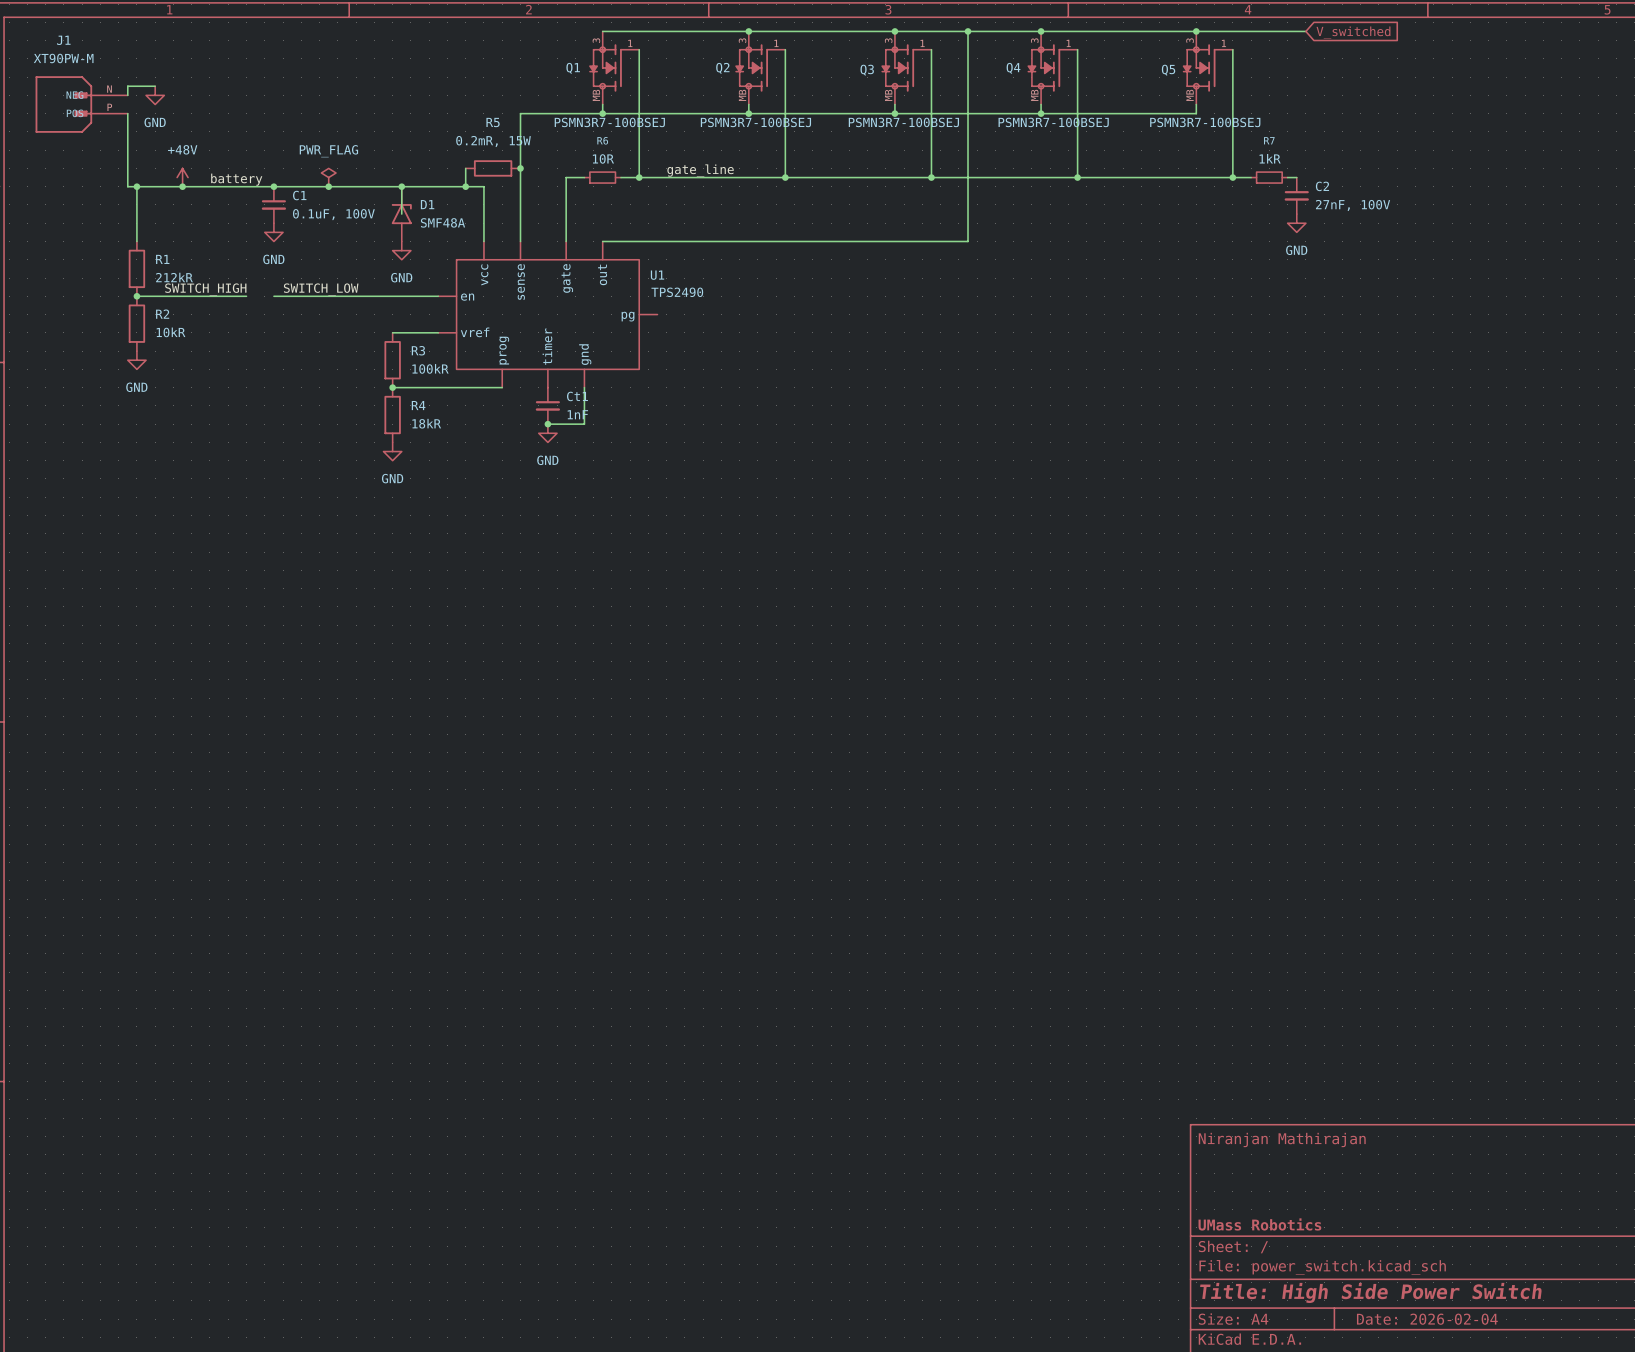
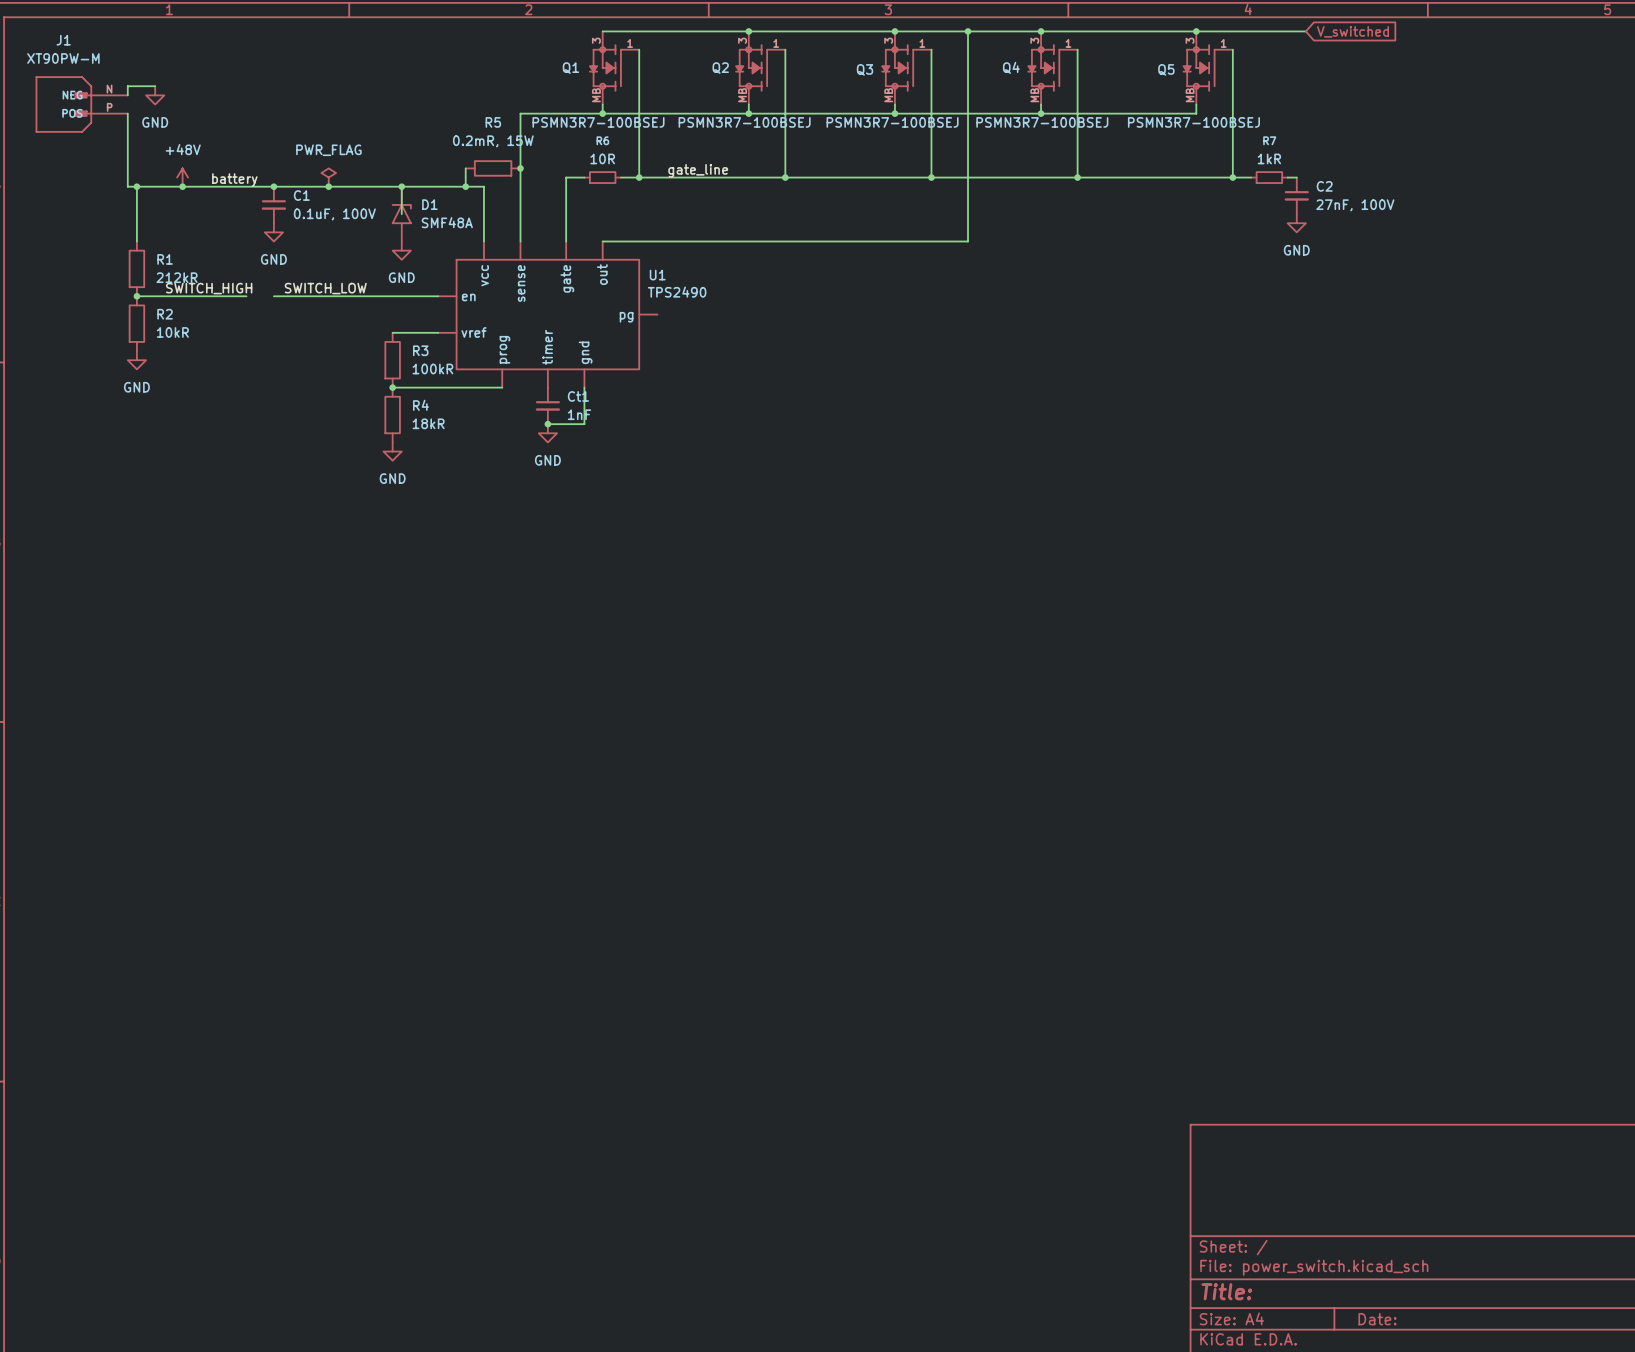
title block: Niranjan Mathirajan (1282, 1140) -> none
title block: UMass Robotics (1259, 1224) -> none
title block: Title: High Side Power Switch (1370, 1292) -> Title: (1226, 1291)
title block: Date: 2026-02-04 (1427, 1319) -> Date: (1377, 1319)

